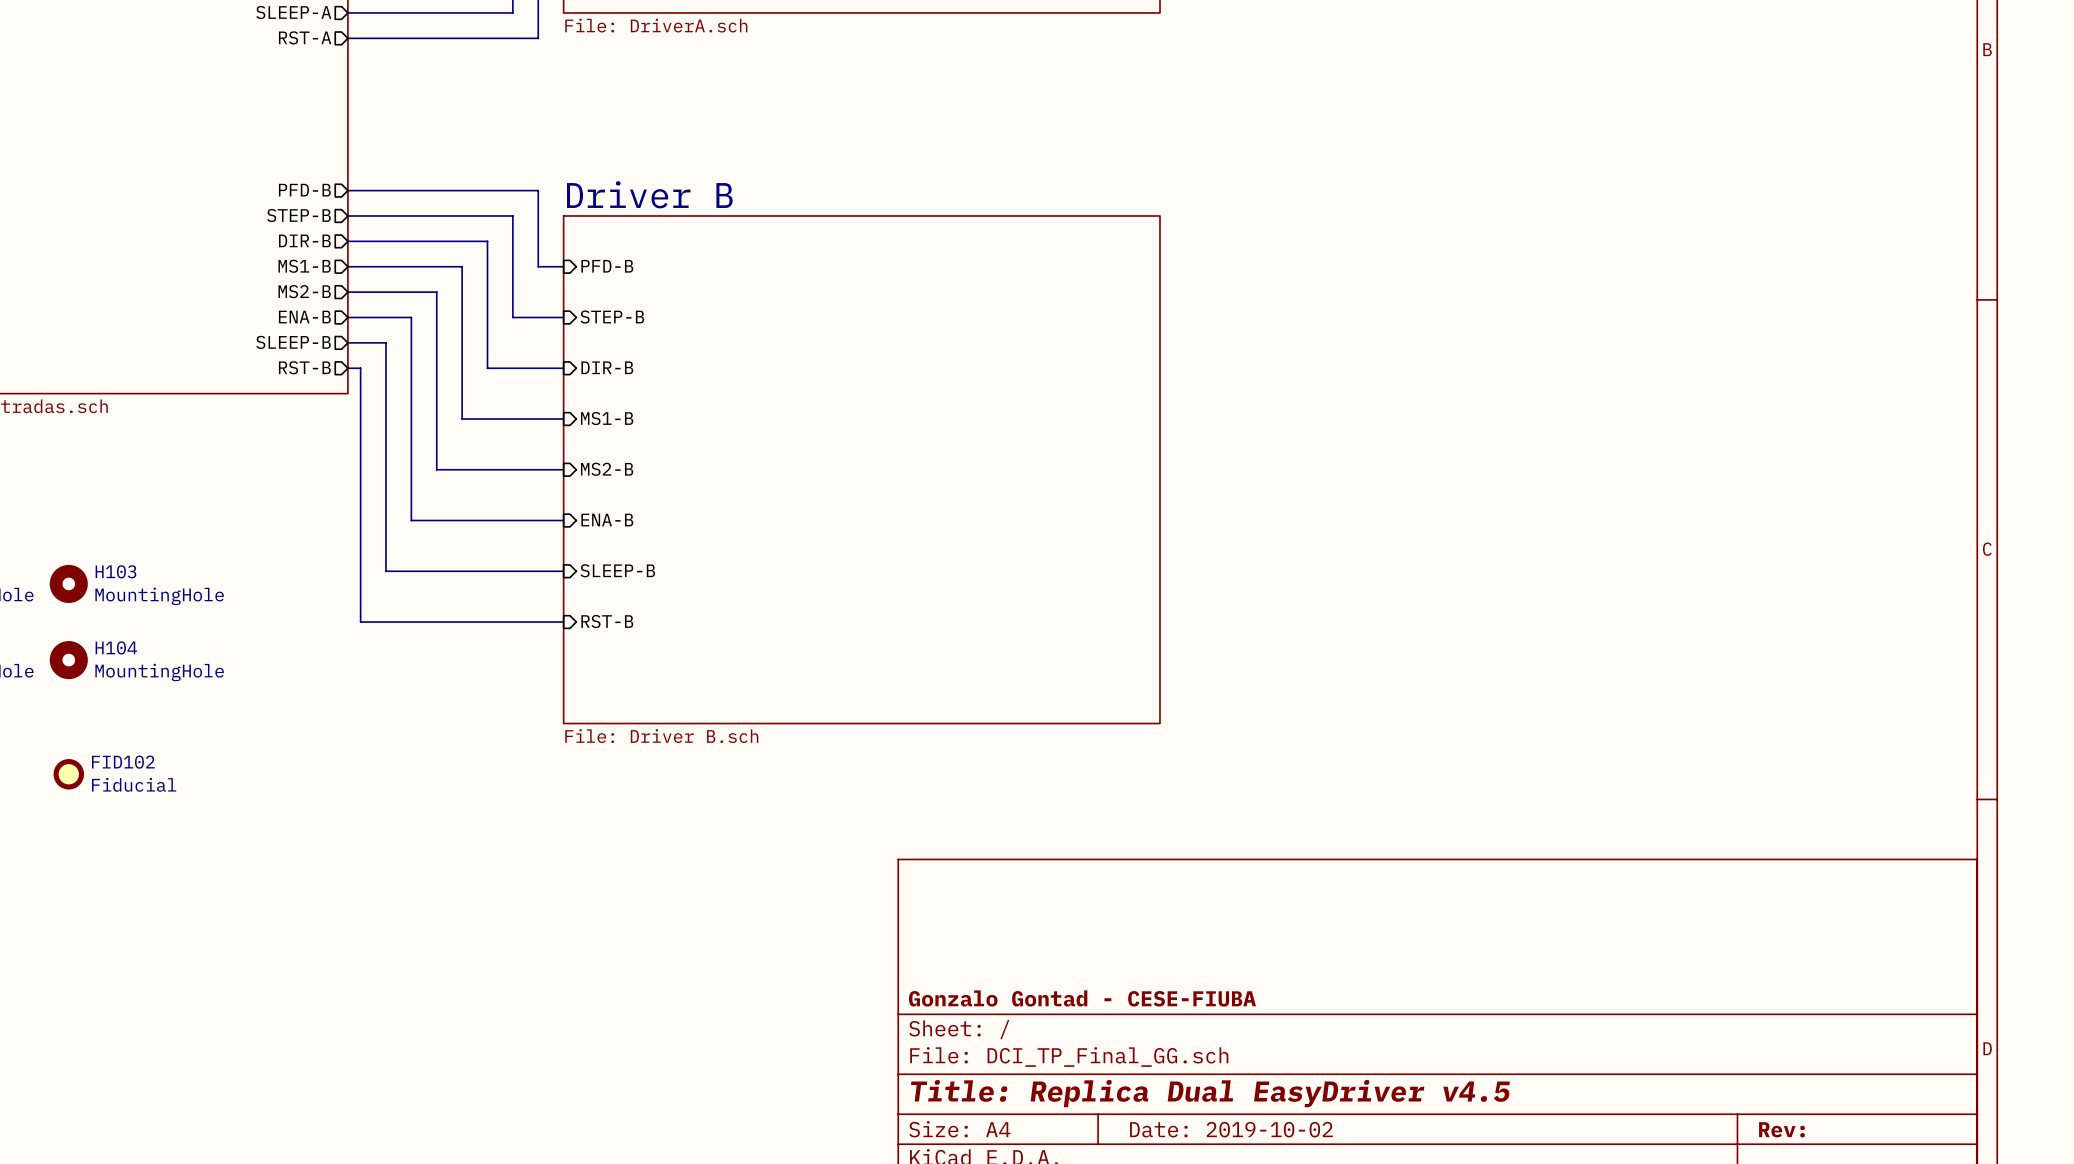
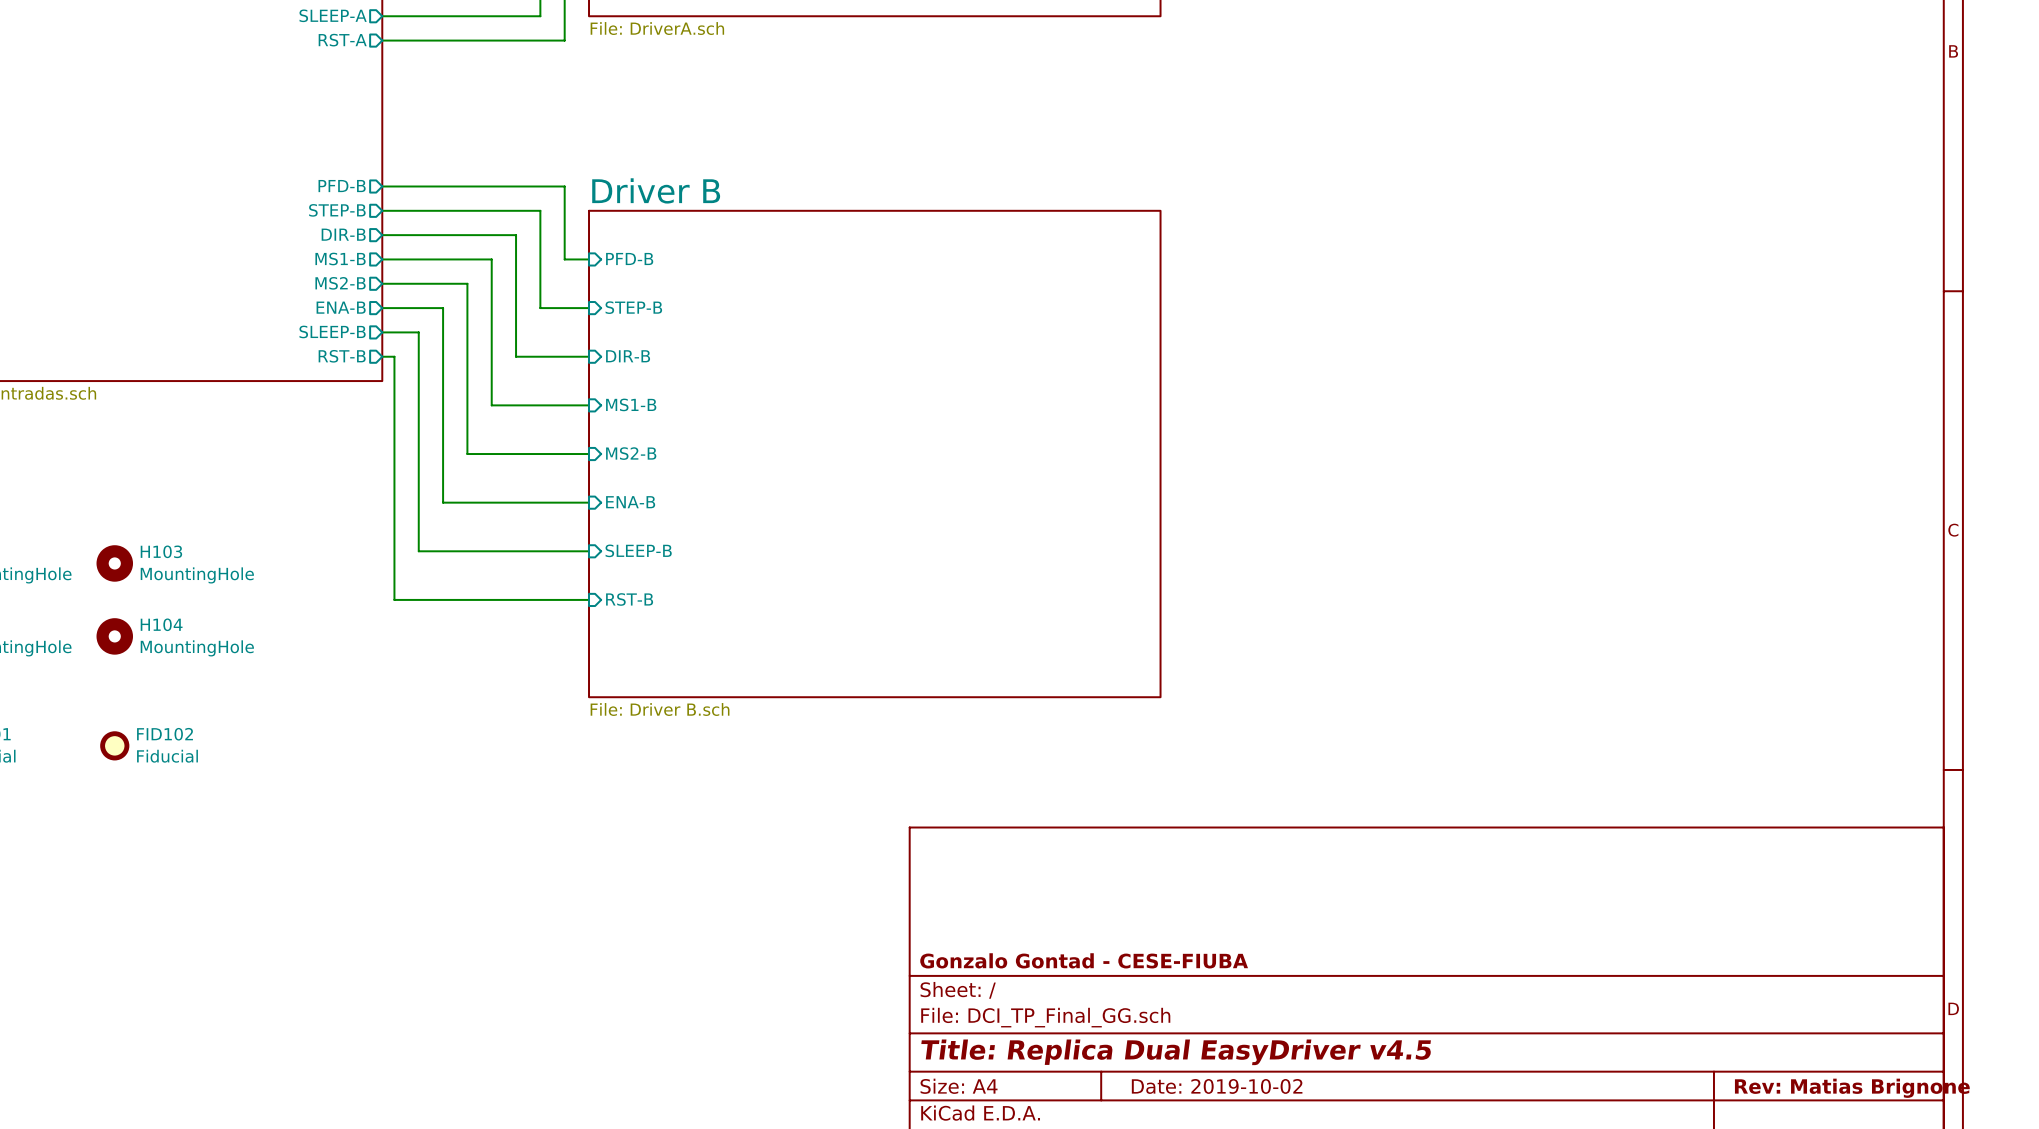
title block: Rev: (1781, 1129) -> Rev: Matias Brignone (1852, 1088)

